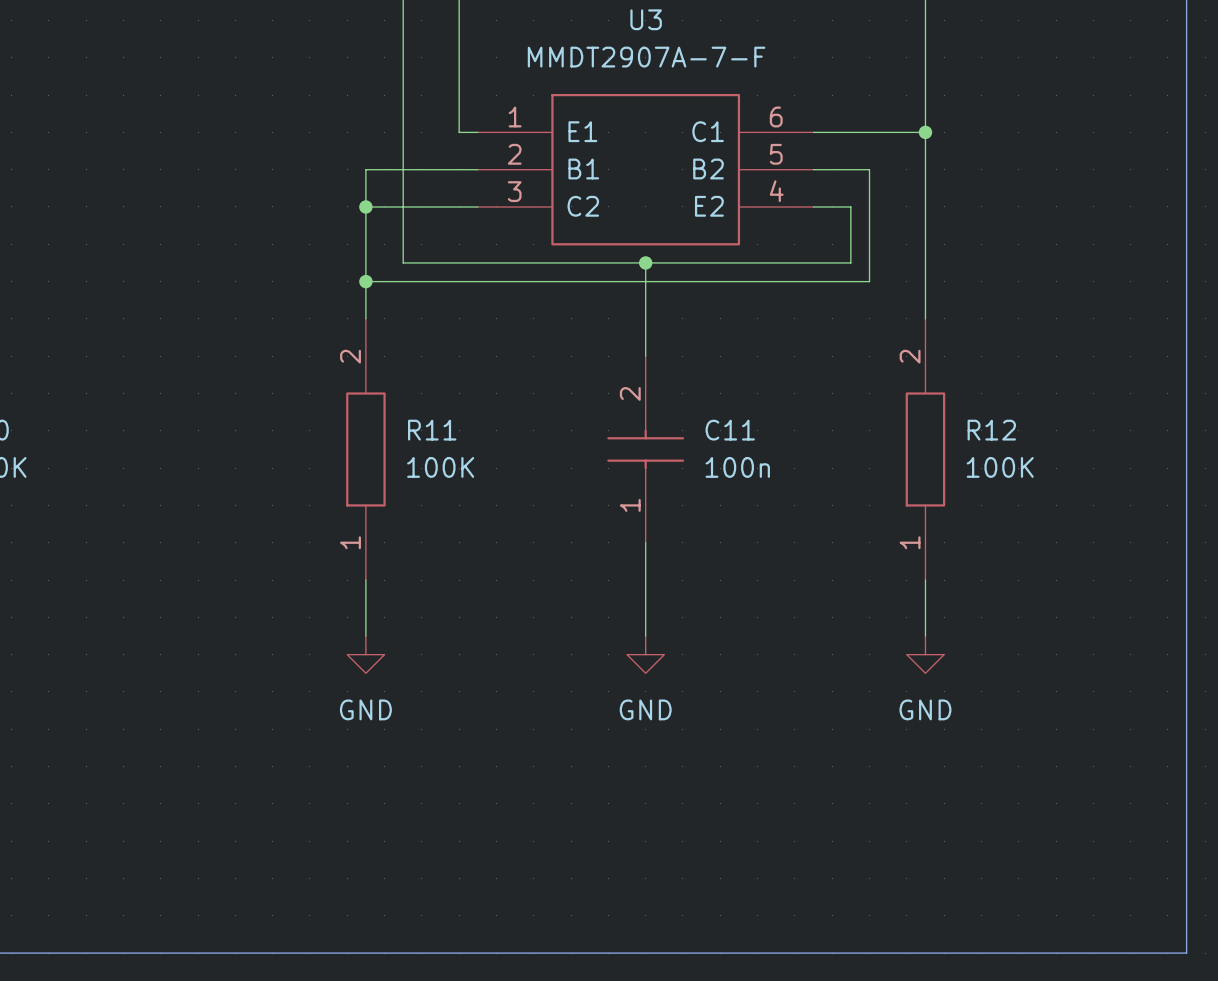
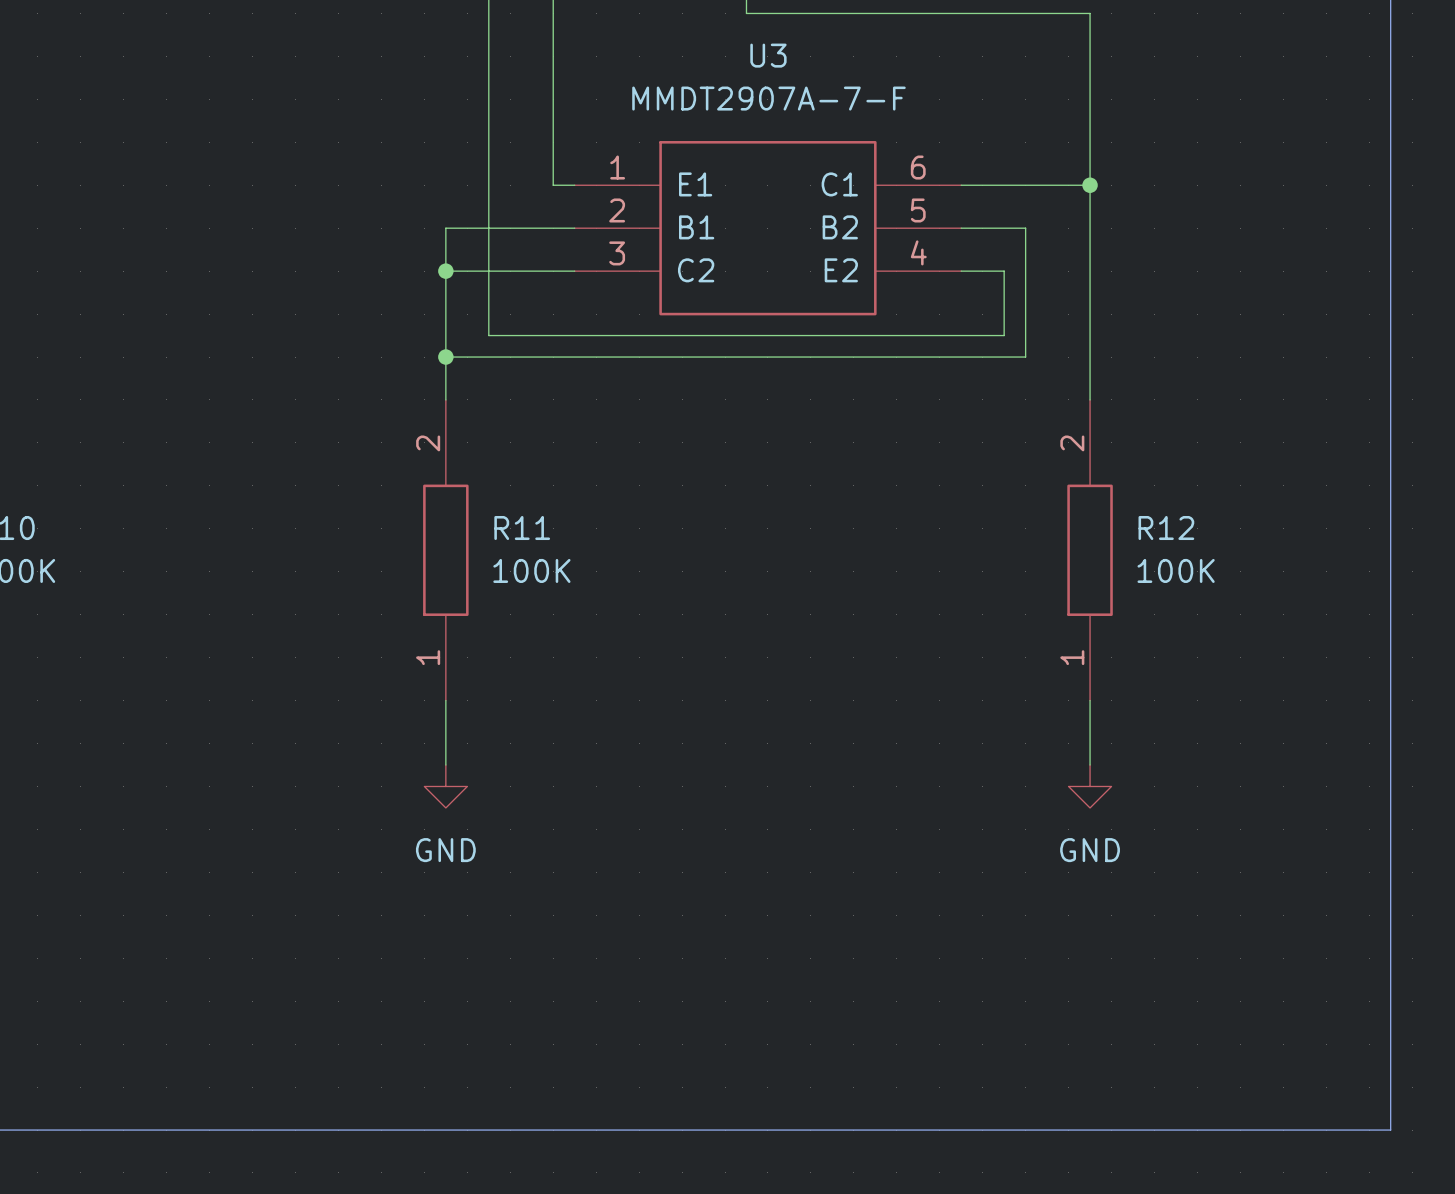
wire: (645, 262) (645, 356) -> none
junction: (645, 262) -> none
C11: 100n (645, 449) -> none
wire: (645, 542) (645, 635) -> none
power symbol: GND (645, 654) -> none

